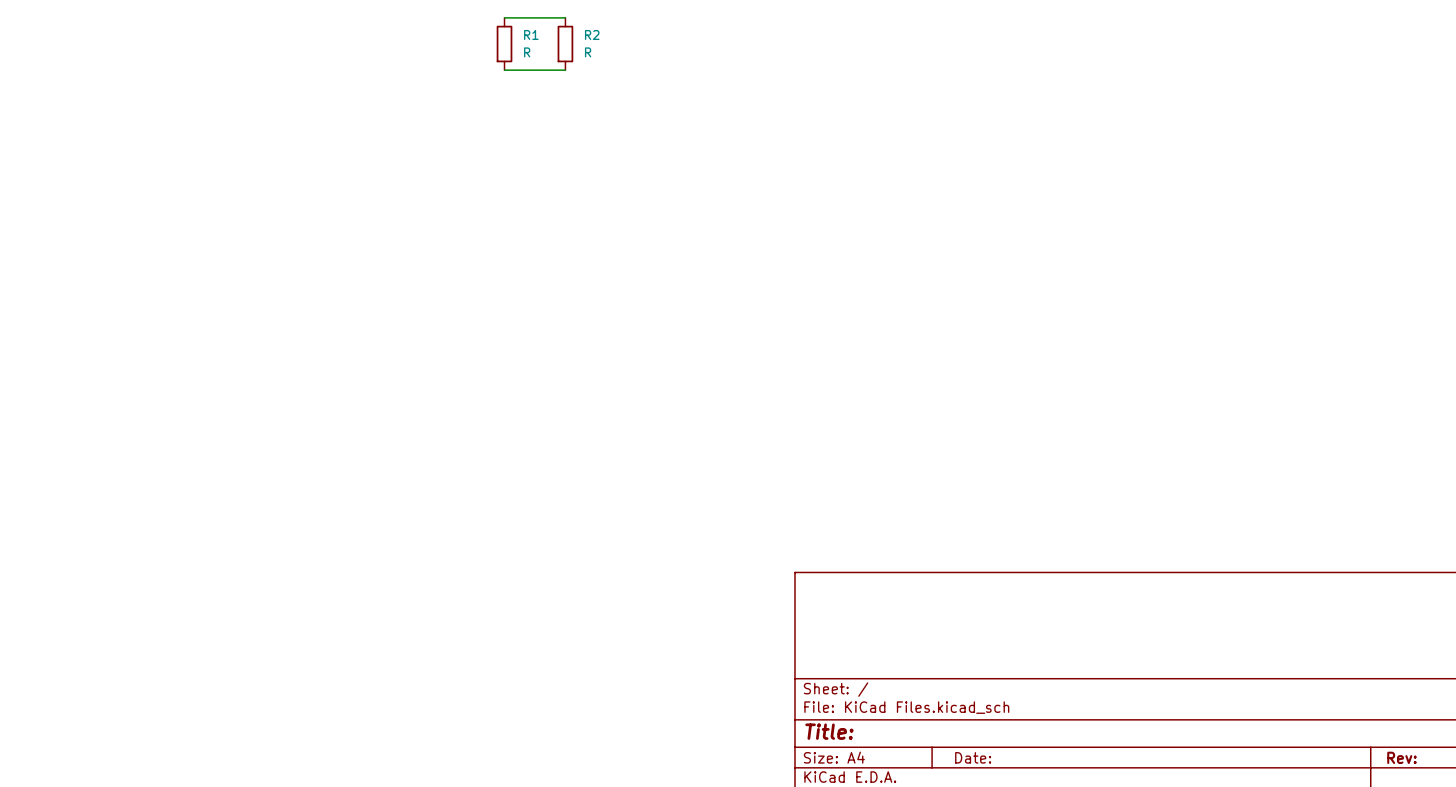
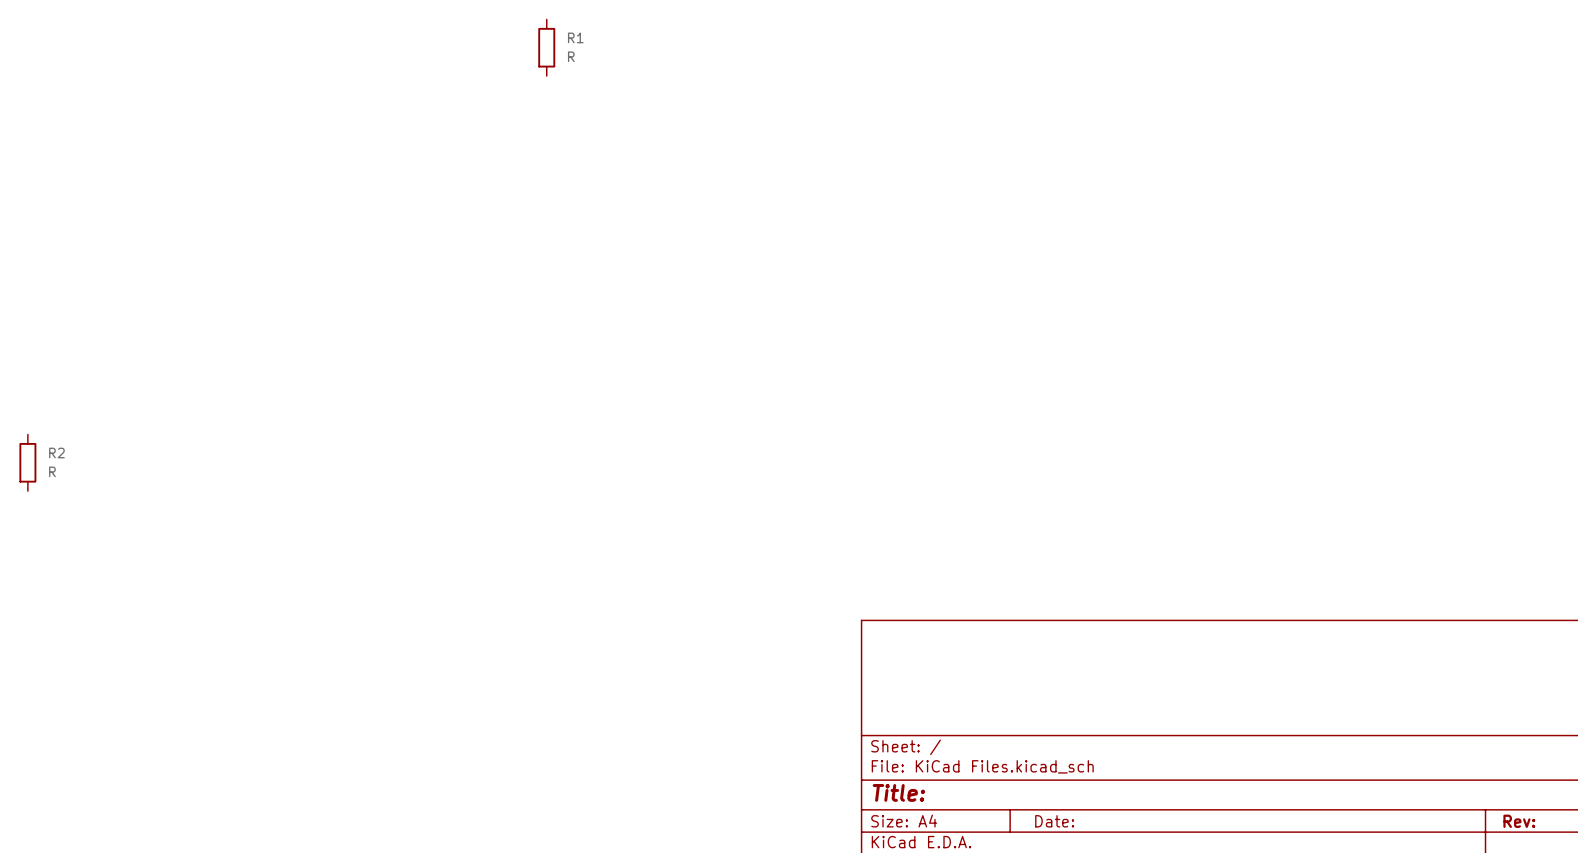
wire: (504, 17) (565, 17) -> none
R2 position: (565, 44) -> (27, 462)
wire: (504, 70) (565, 70) -> none

